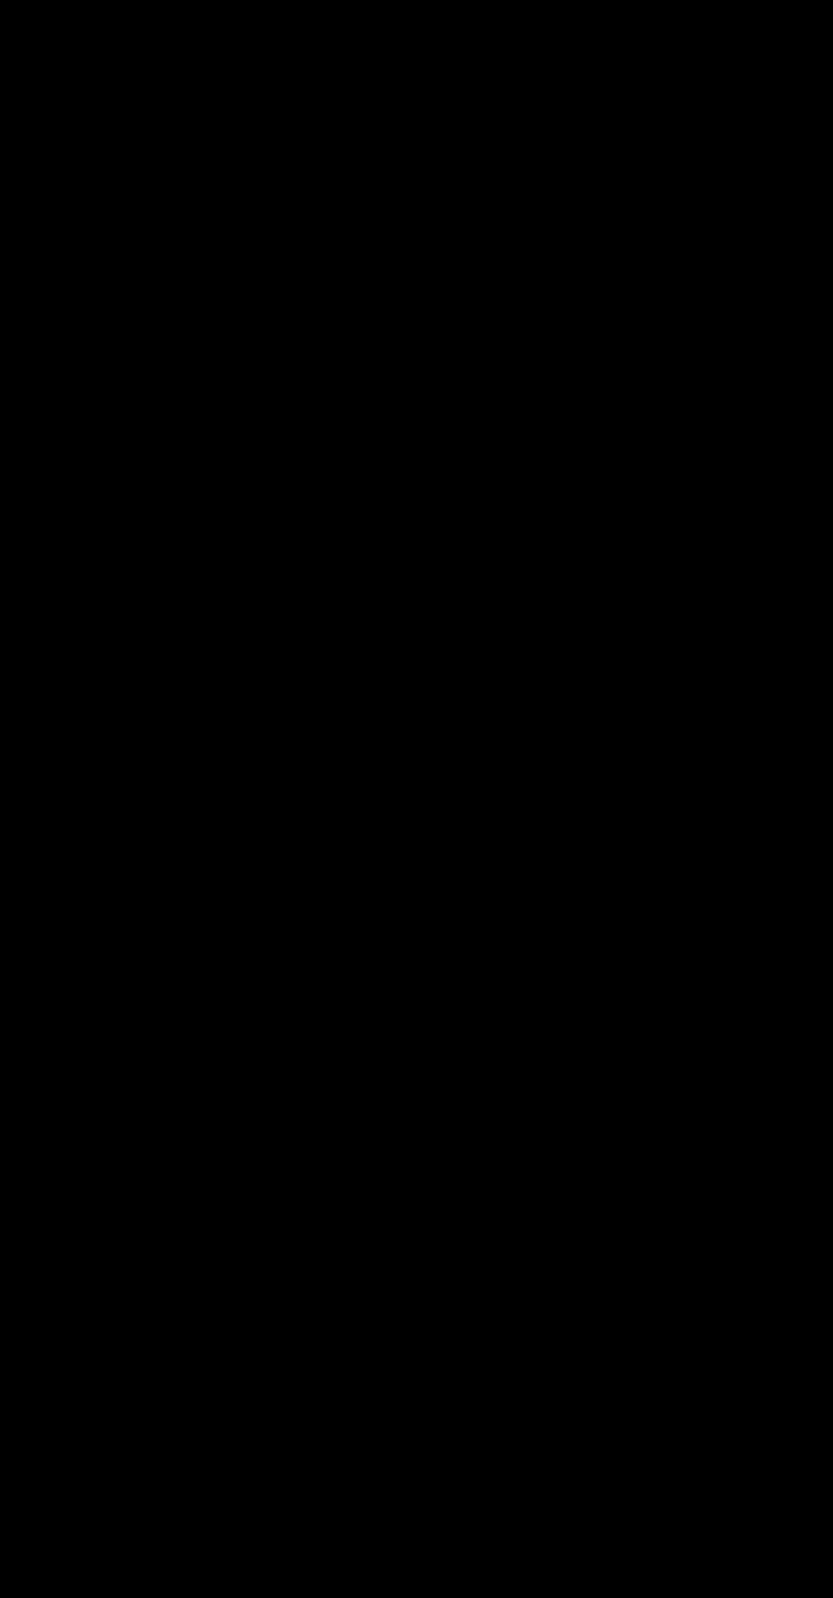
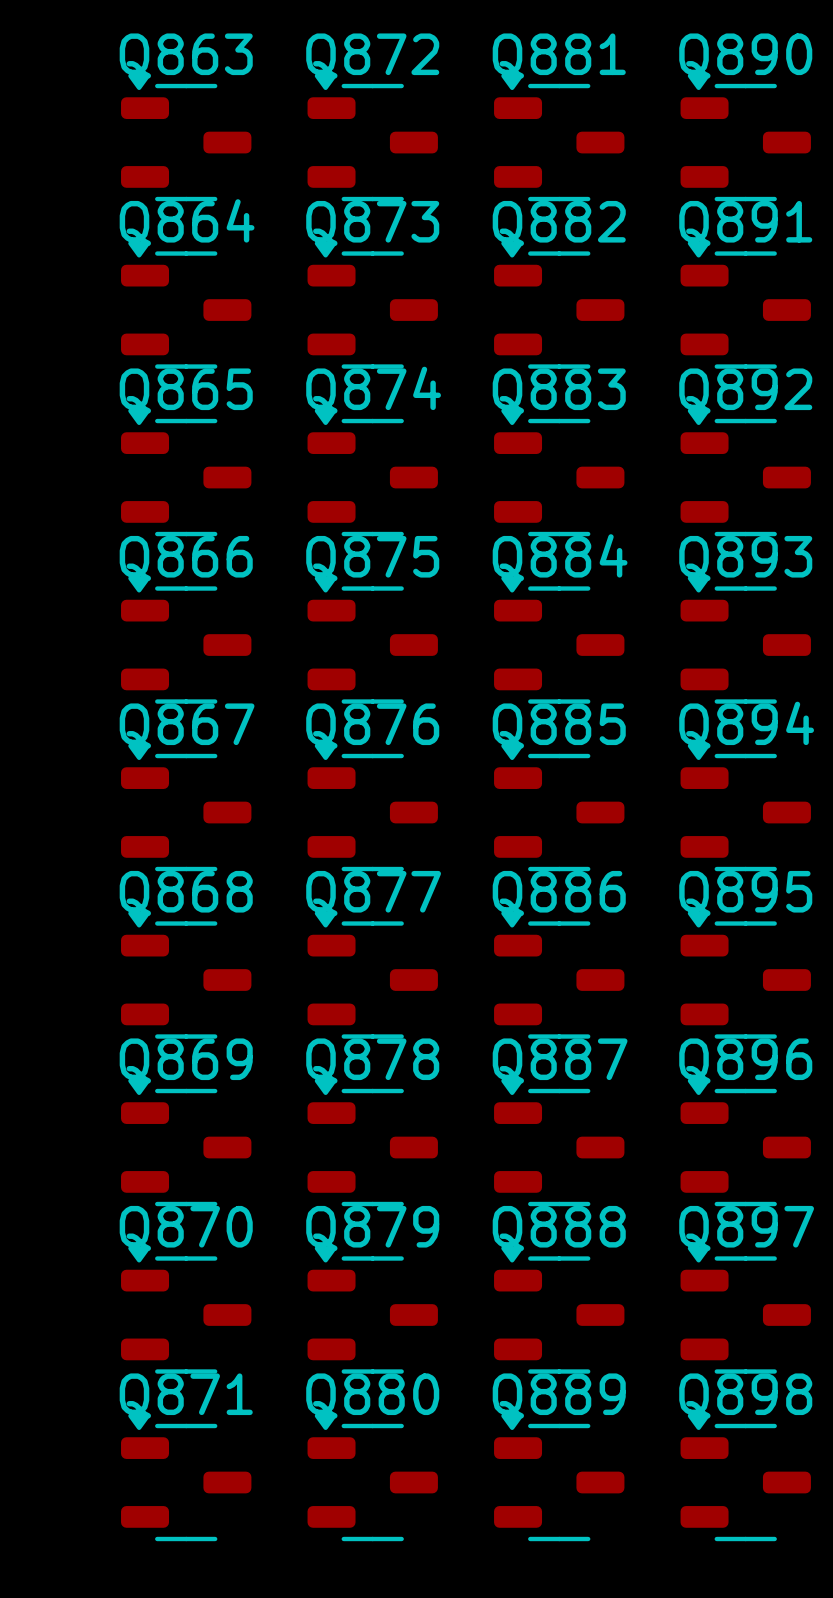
Q863: none -> (186, 137)
Q872: none -> (372, 137)
Q881: none -> (559, 137)
Q890: none -> (745, 137)
Q864: none -> (186, 304)
Q873: none -> (372, 304)
Q882: none -> (559, 304)
Q891: none -> (745, 304)
Q865: none -> (186, 472)
Q874: none -> (372, 472)
Q883: none -> (559, 472)
Q892: none -> (745, 472)
Q866: none -> (186, 639)
Q875: none -> (372, 639)
Q884: none -> (559, 639)
Q893: none -> (745, 639)
Q867: none -> (186, 807)
Q876: none -> (372, 807)
Q885: none -> (559, 807)
Q894: none -> (745, 807)
Q868: none -> (186, 974)
Q877: none -> (372, 974)
Q886: none -> (559, 974)
Q895: none -> (745, 974)
Q869: none -> (186, 1142)
Q878: none -> (372, 1142)
Q887: none -> (559, 1142)
Q896: none -> (745, 1142)
Q870: none -> (186, 1309)
Q879: none -> (372, 1309)
Q888: none -> (559, 1309)
Q897: none -> (745, 1309)
Q871: none -> (186, 1477)
Q880: none -> (372, 1477)
Q889: none -> (559, 1477)
Q898: none -> (745, 1477)

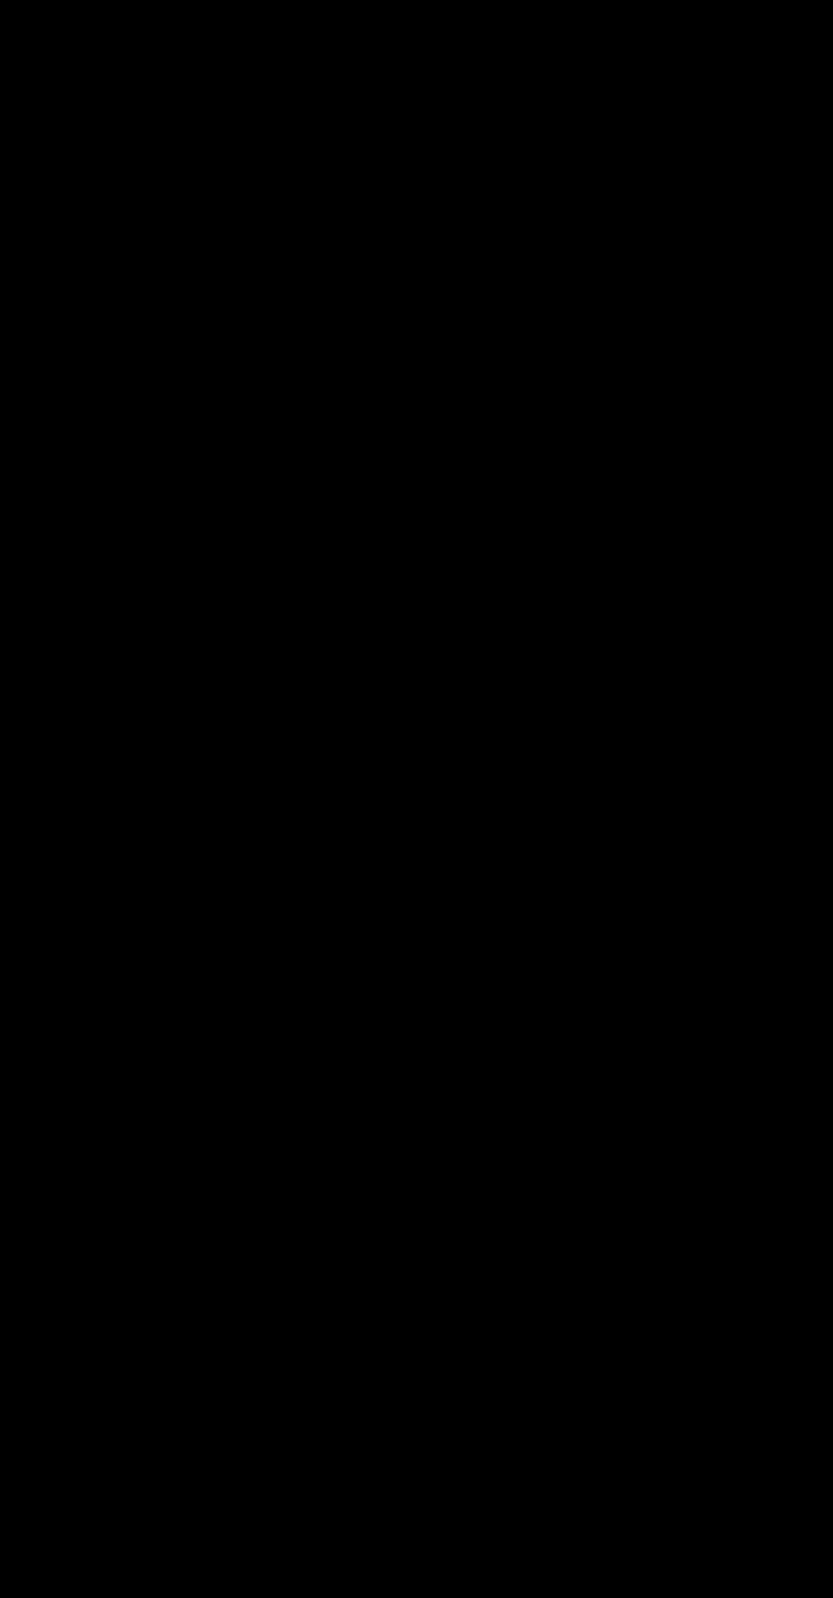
Q863: (186, 137) -> none
Q872: (372, 137) -> none
Q881: (559, 137) -> none
Q890: (745, 137) -> none
Q864: (186, 304) -> none
Q873: (372, 304) -> none
Q882: (559, 304) -> none
Q891: (745, 304) -> none
Q865: (186, 472) -> none
Q874: (372, 472) -> none
Q883: (559, 472) -> none
Q892: (745, 472) -> none
Q866: (186, 639) -> none
Q875: (372, 639) -> none
Q884: (559, 639) -> none
Q893: (745, 639) -> none
Q867: (186, 807) -> none
Q876: (372, 807) -> none
Q885: (559, 807) -> none
Q894: (745, 807) -> none
Q868: (186, 974) -> none
Q877: (372, 974) -> none
Q886: (559, 974) -> none
Q895: (745, 974) -> none
Q869: (186, 1142) -> none
Q878: (372, 1142) -> none
Q887: (559, 1142) -> none
Q896: (745, 1142) -> none
Q870: (186, 1309) -> none
Q879: (372, 1309) -> none
Q888: (559, 1309) -> none
Q897: (745, 1309) -> none
Q871: (186, 1477) -> none
Q880: (372, 1477) -> none
Q889: (559, 1477) -> none
Q898: (745, 1477) -> none

